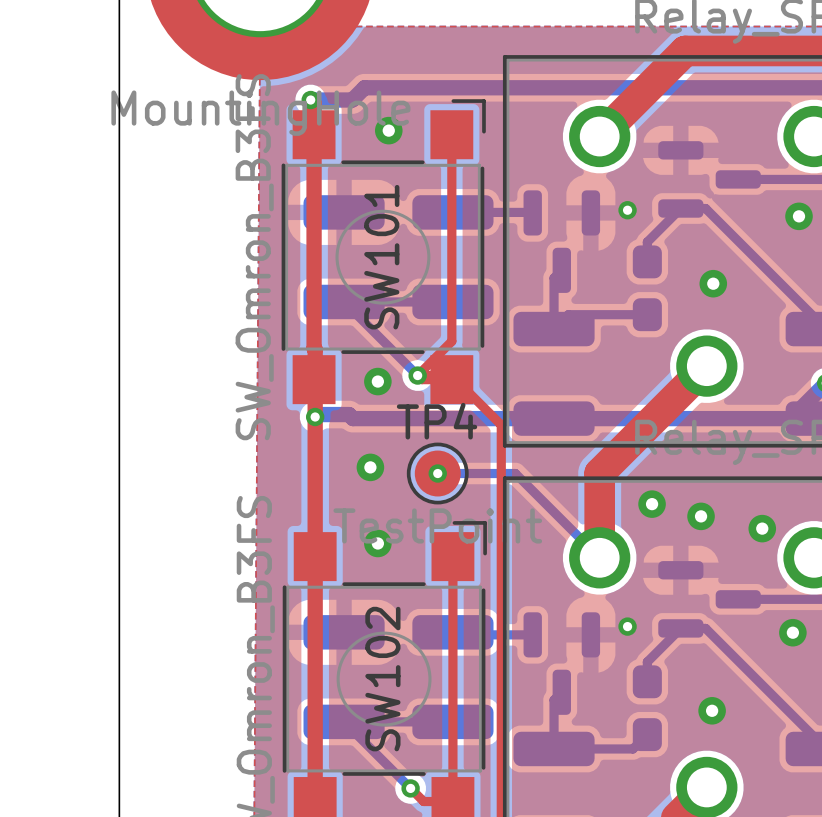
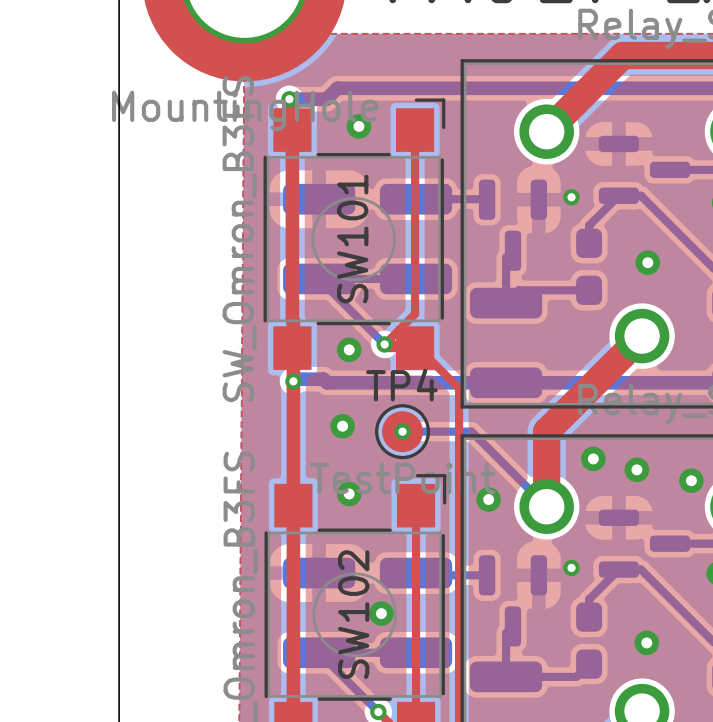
via: none -> (488, 499)
via: none -> (381, 613)

